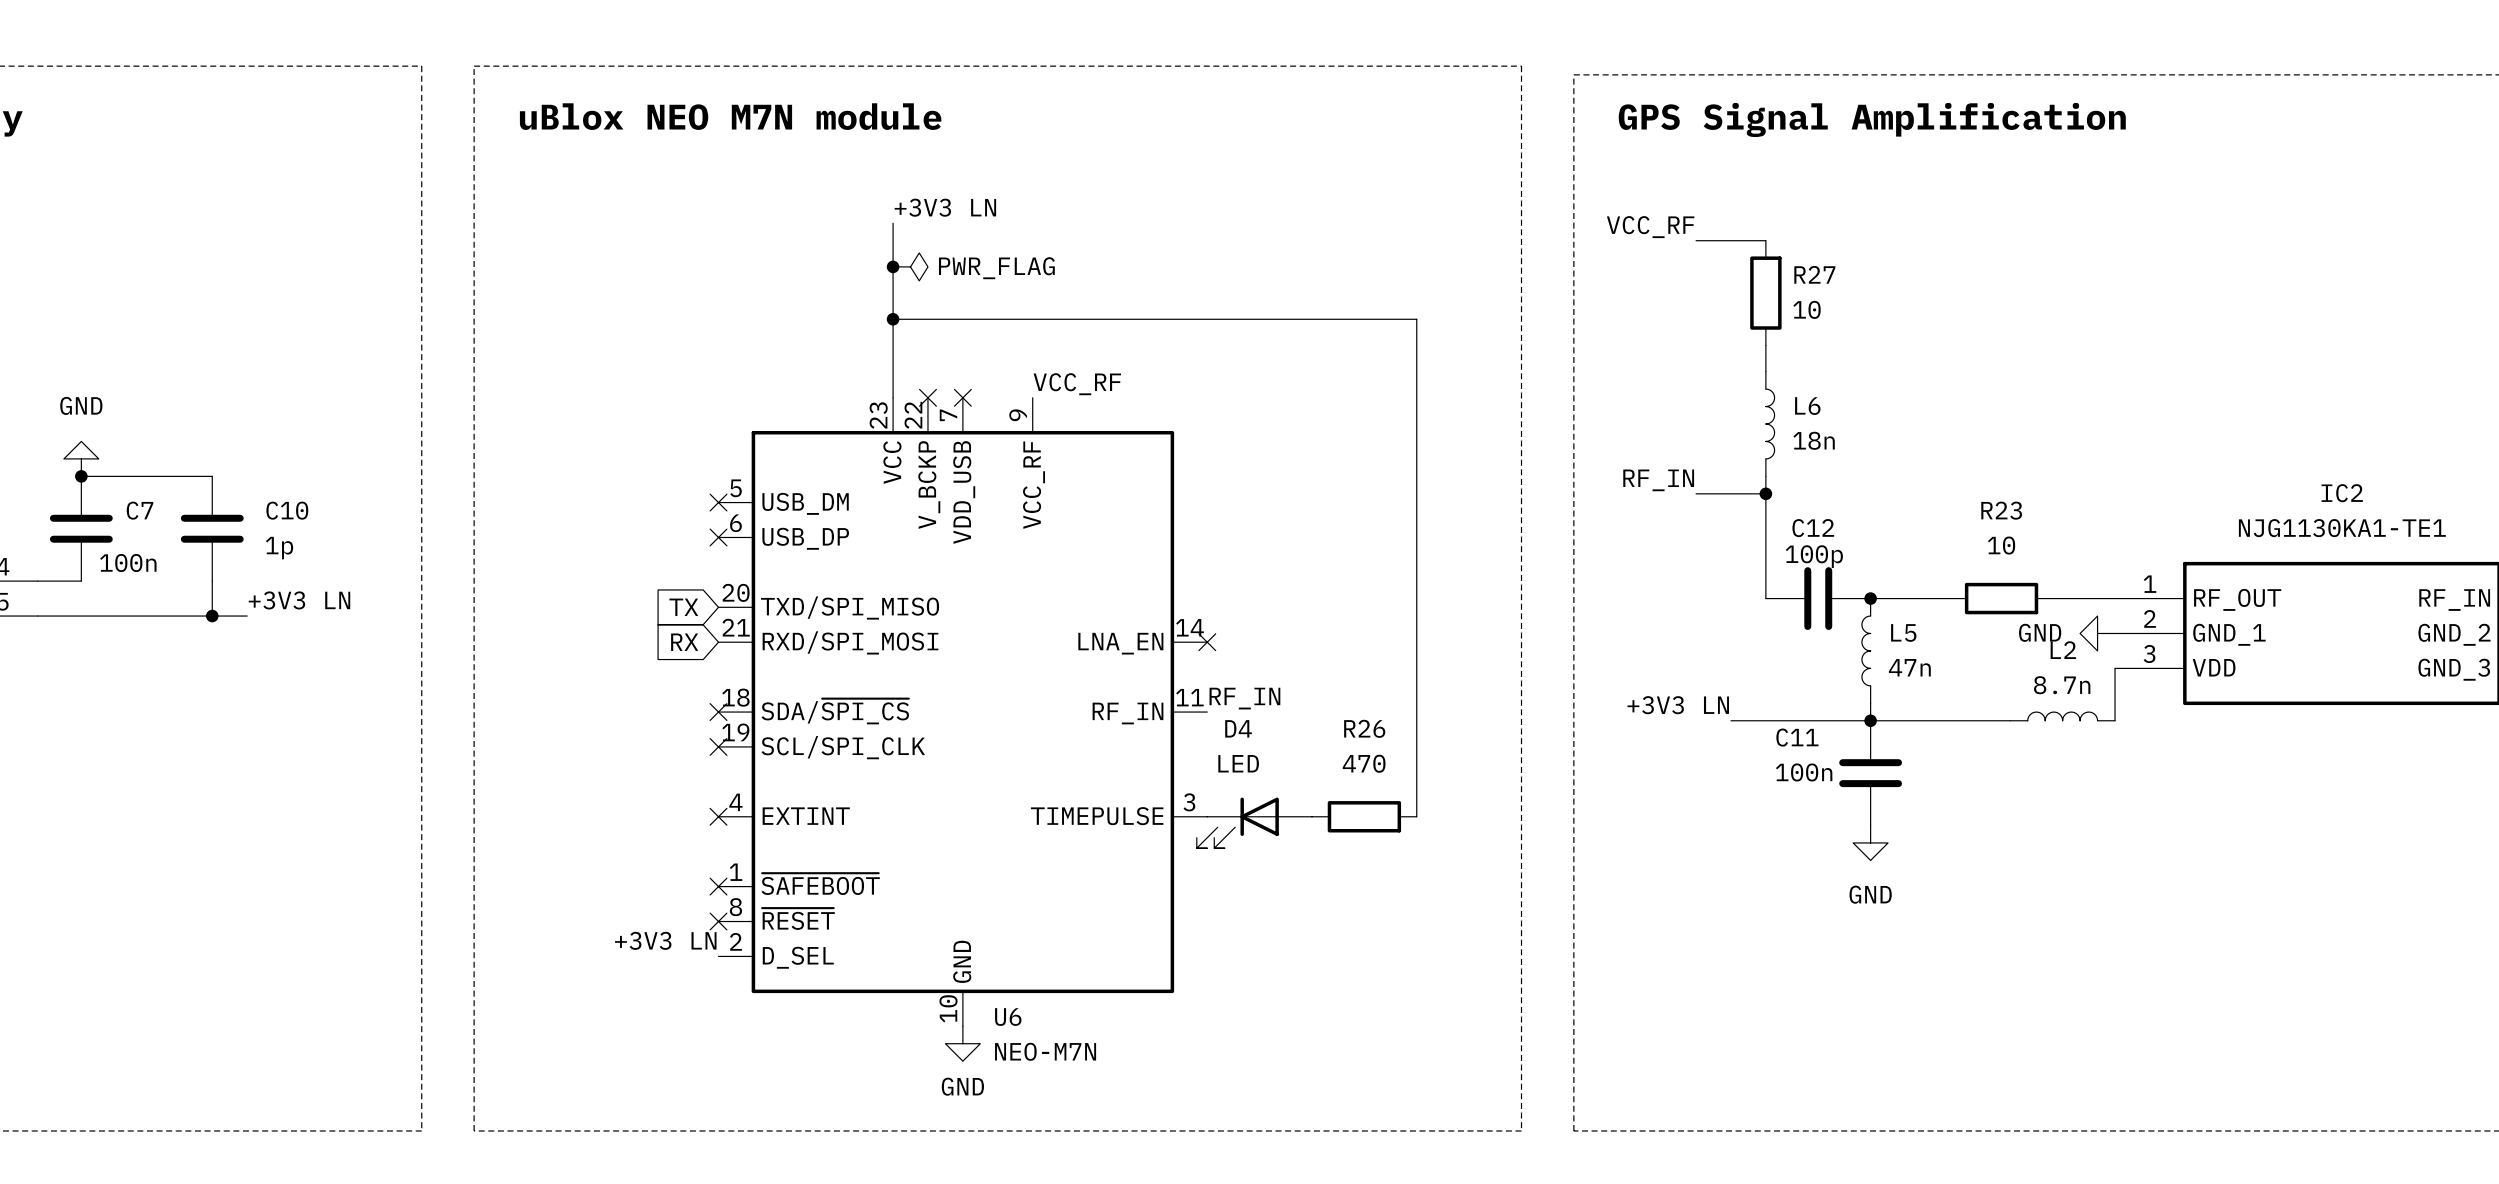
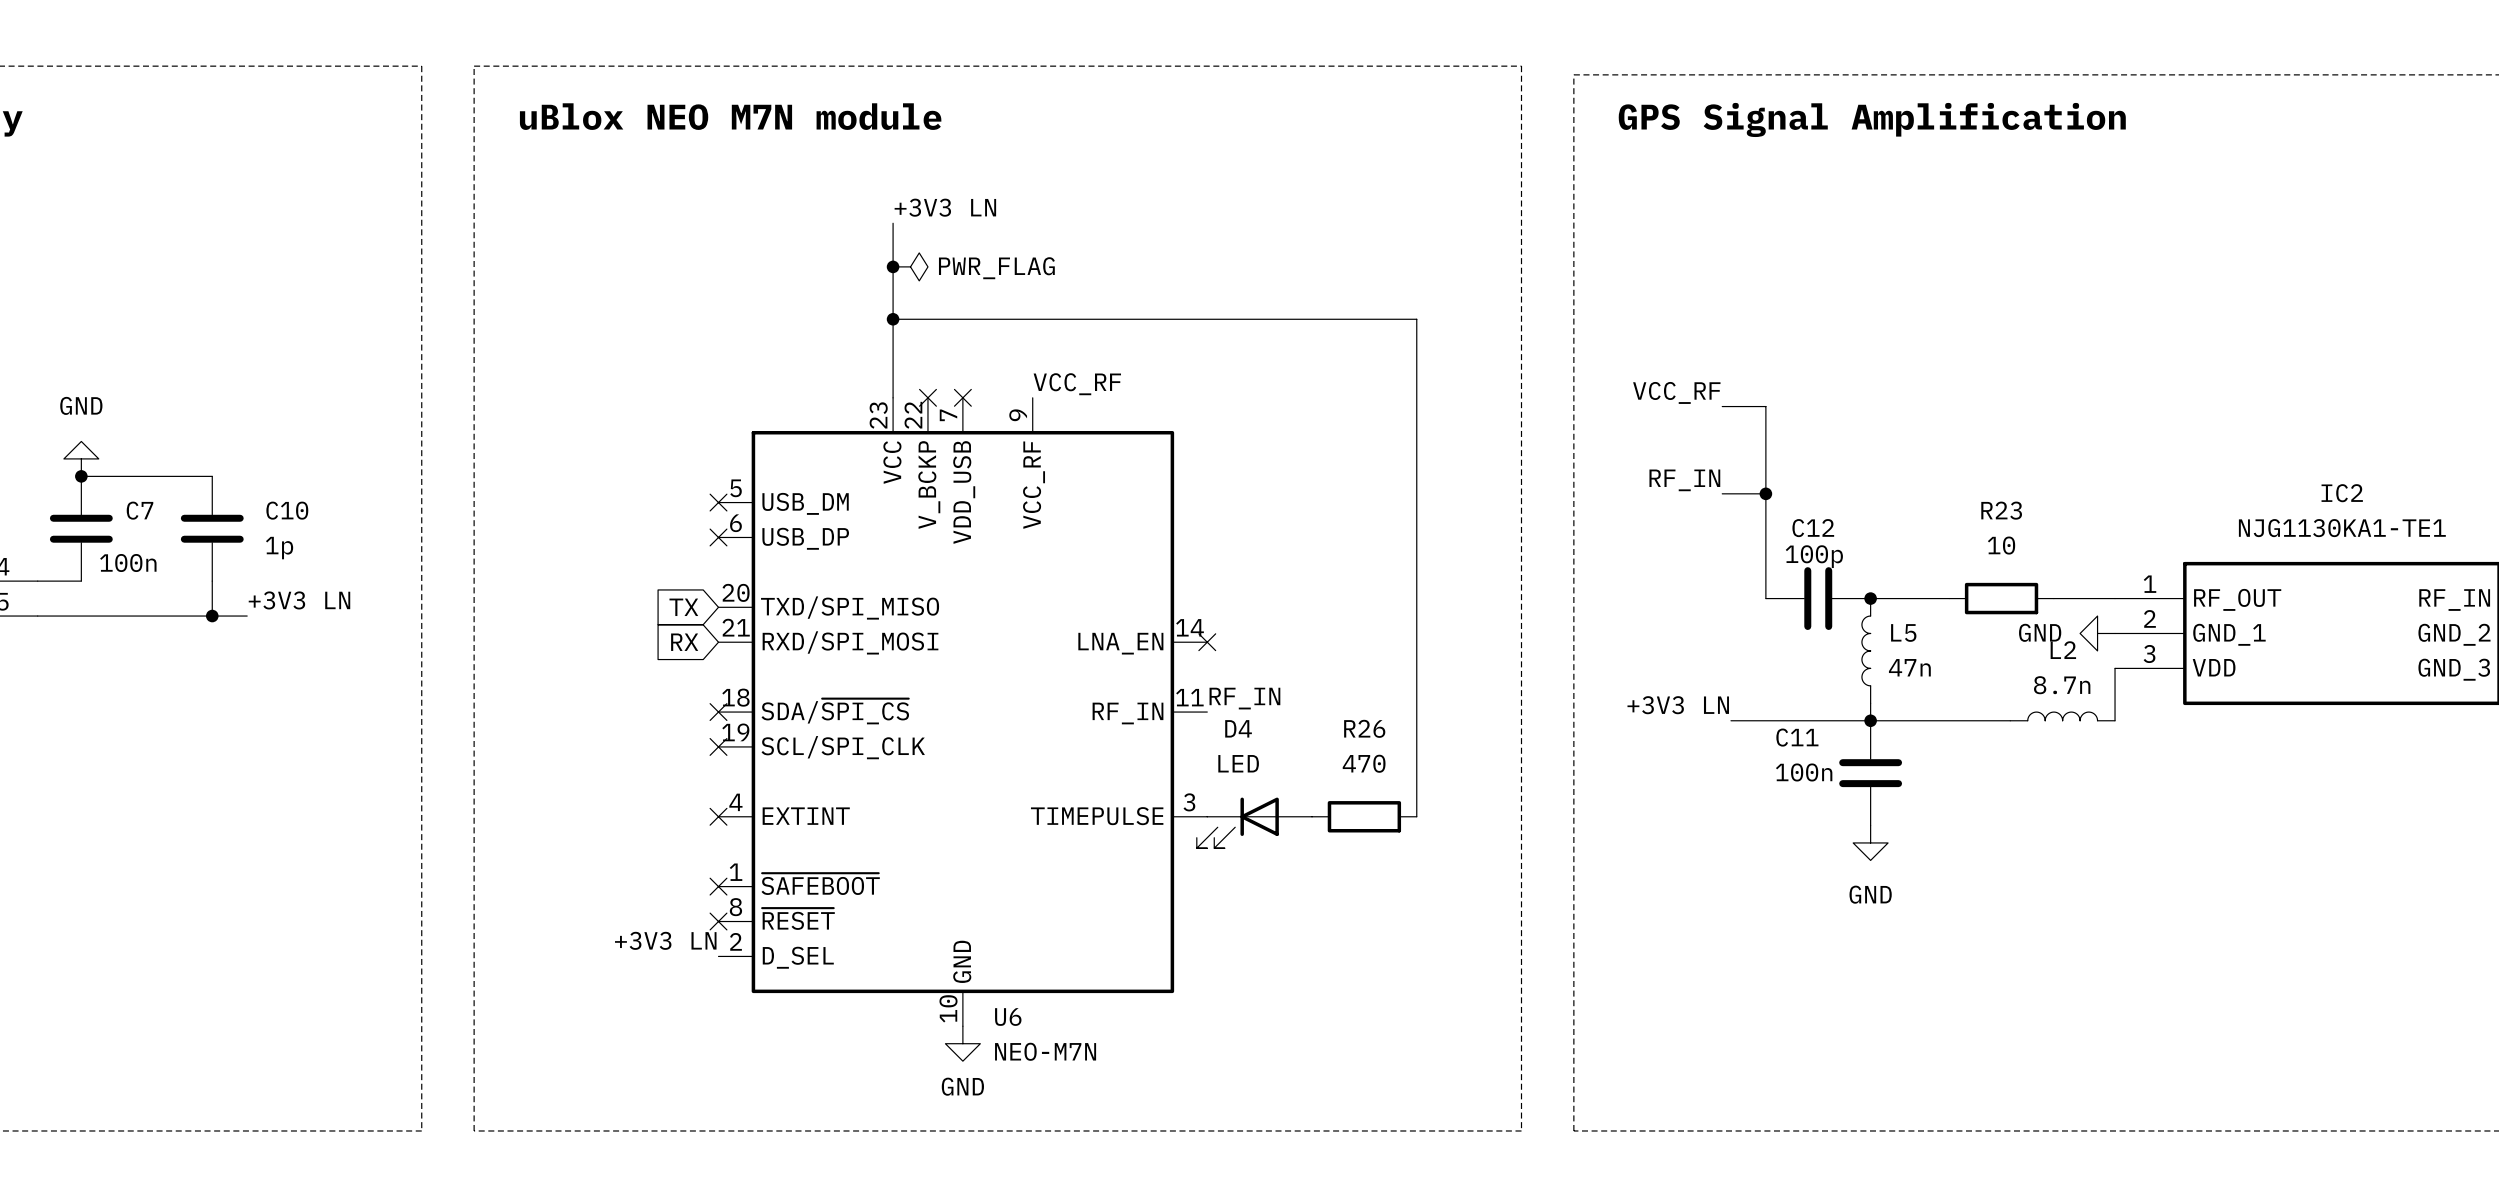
label position: VCC_RF (1650, 227) -> VCC_RF (1676, 392)
wire: (1696, 240) (1765, 240) -> none
R27: 10 (1765, 293) -> none
wire: (1765, 345) (1765, 371) -> none
wire: none -> (1722, 406) (1765, 406) (1765, 476)
L6: 18n (1770, 424) -> none
label position: RF_IN (1658, 480) -> RF_IN (1684, 480)
wire: (1696, 493) (1722, 493) -> none

